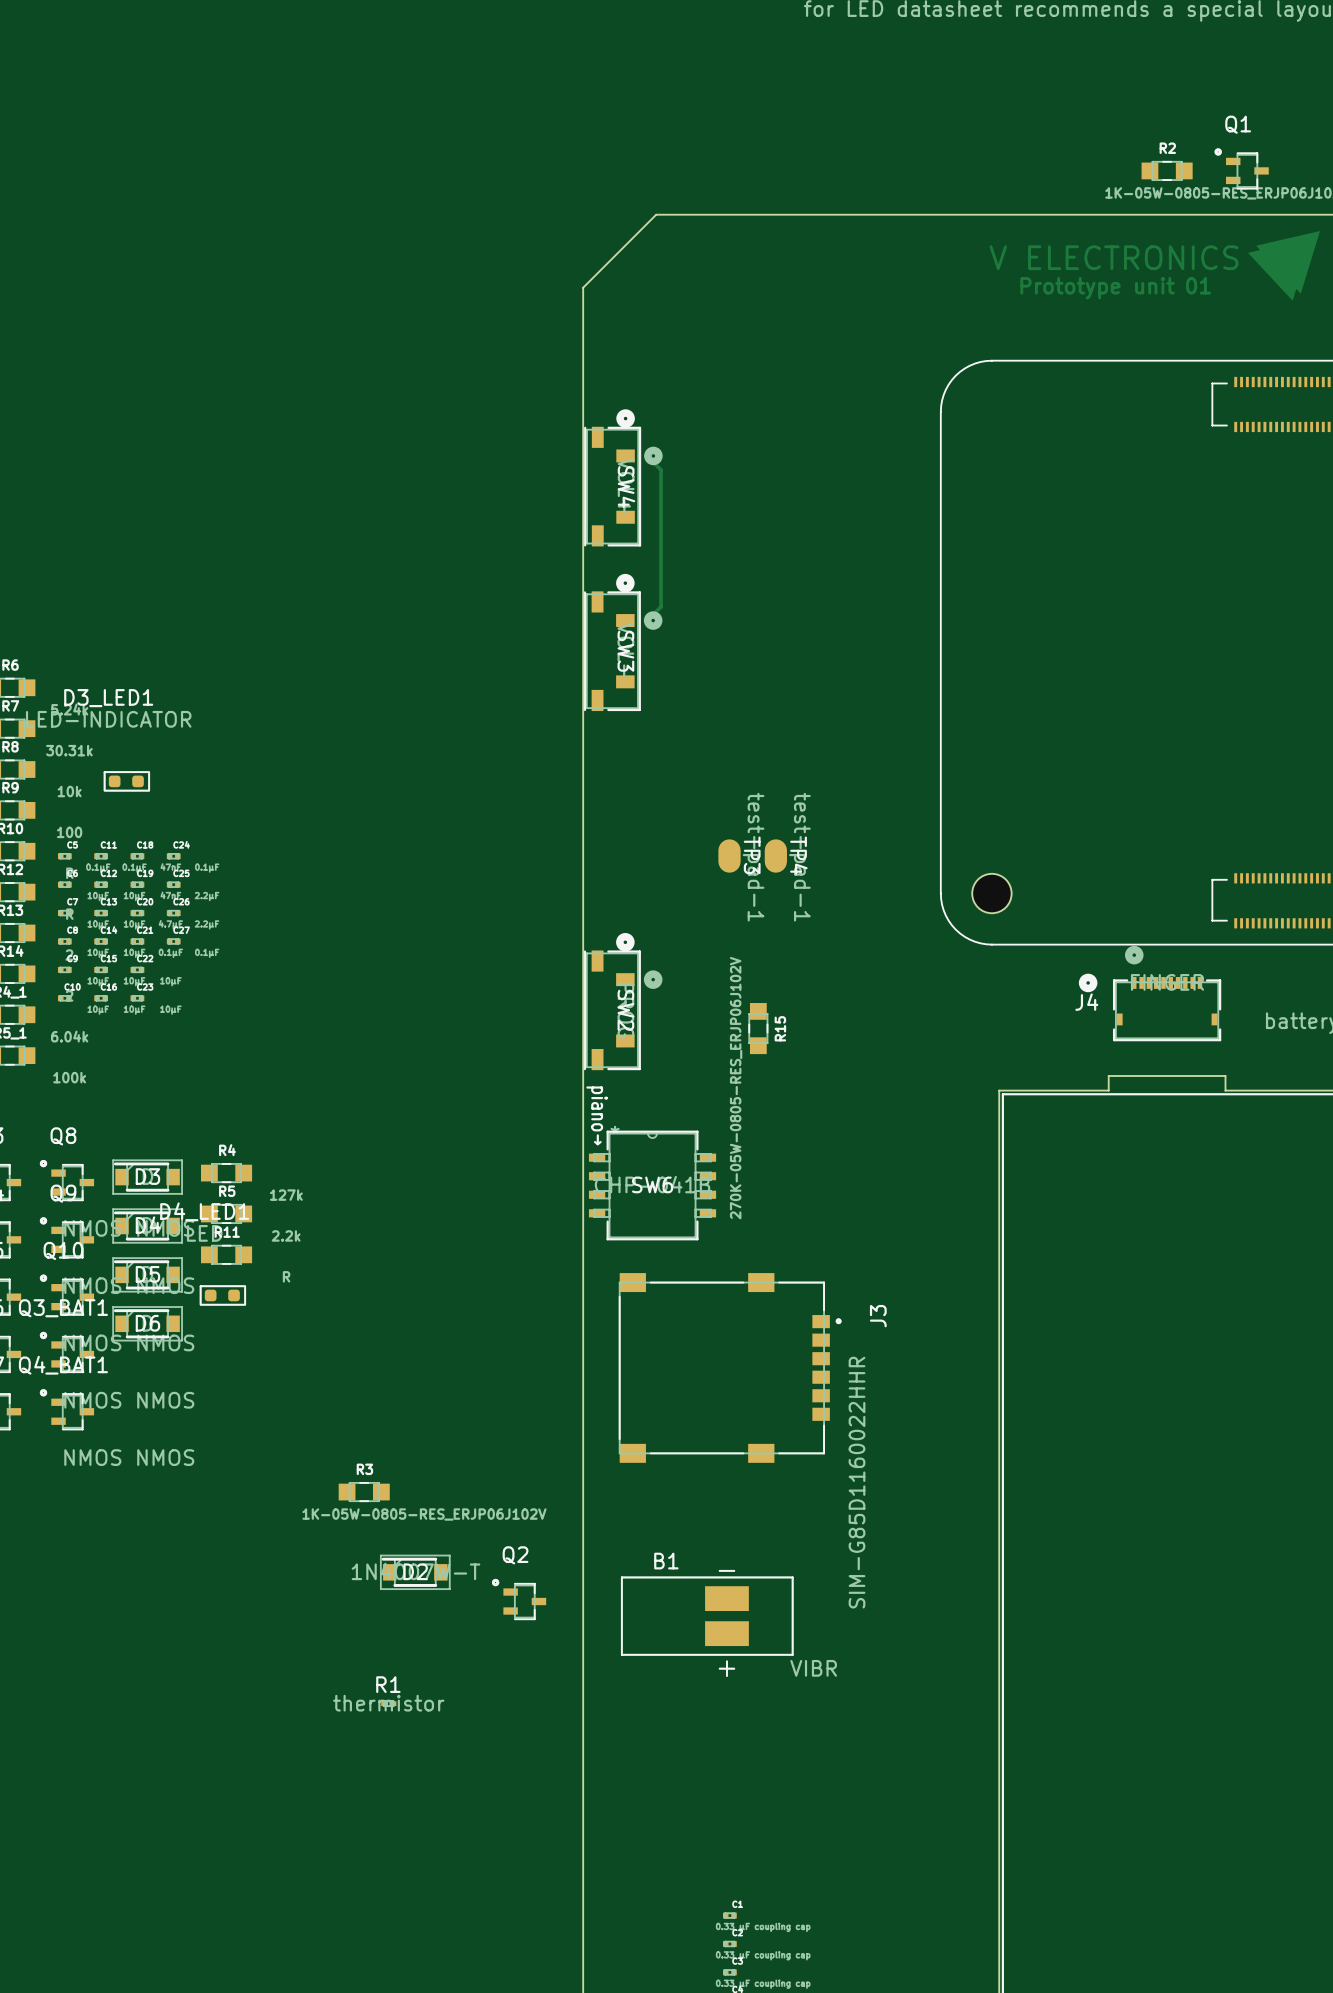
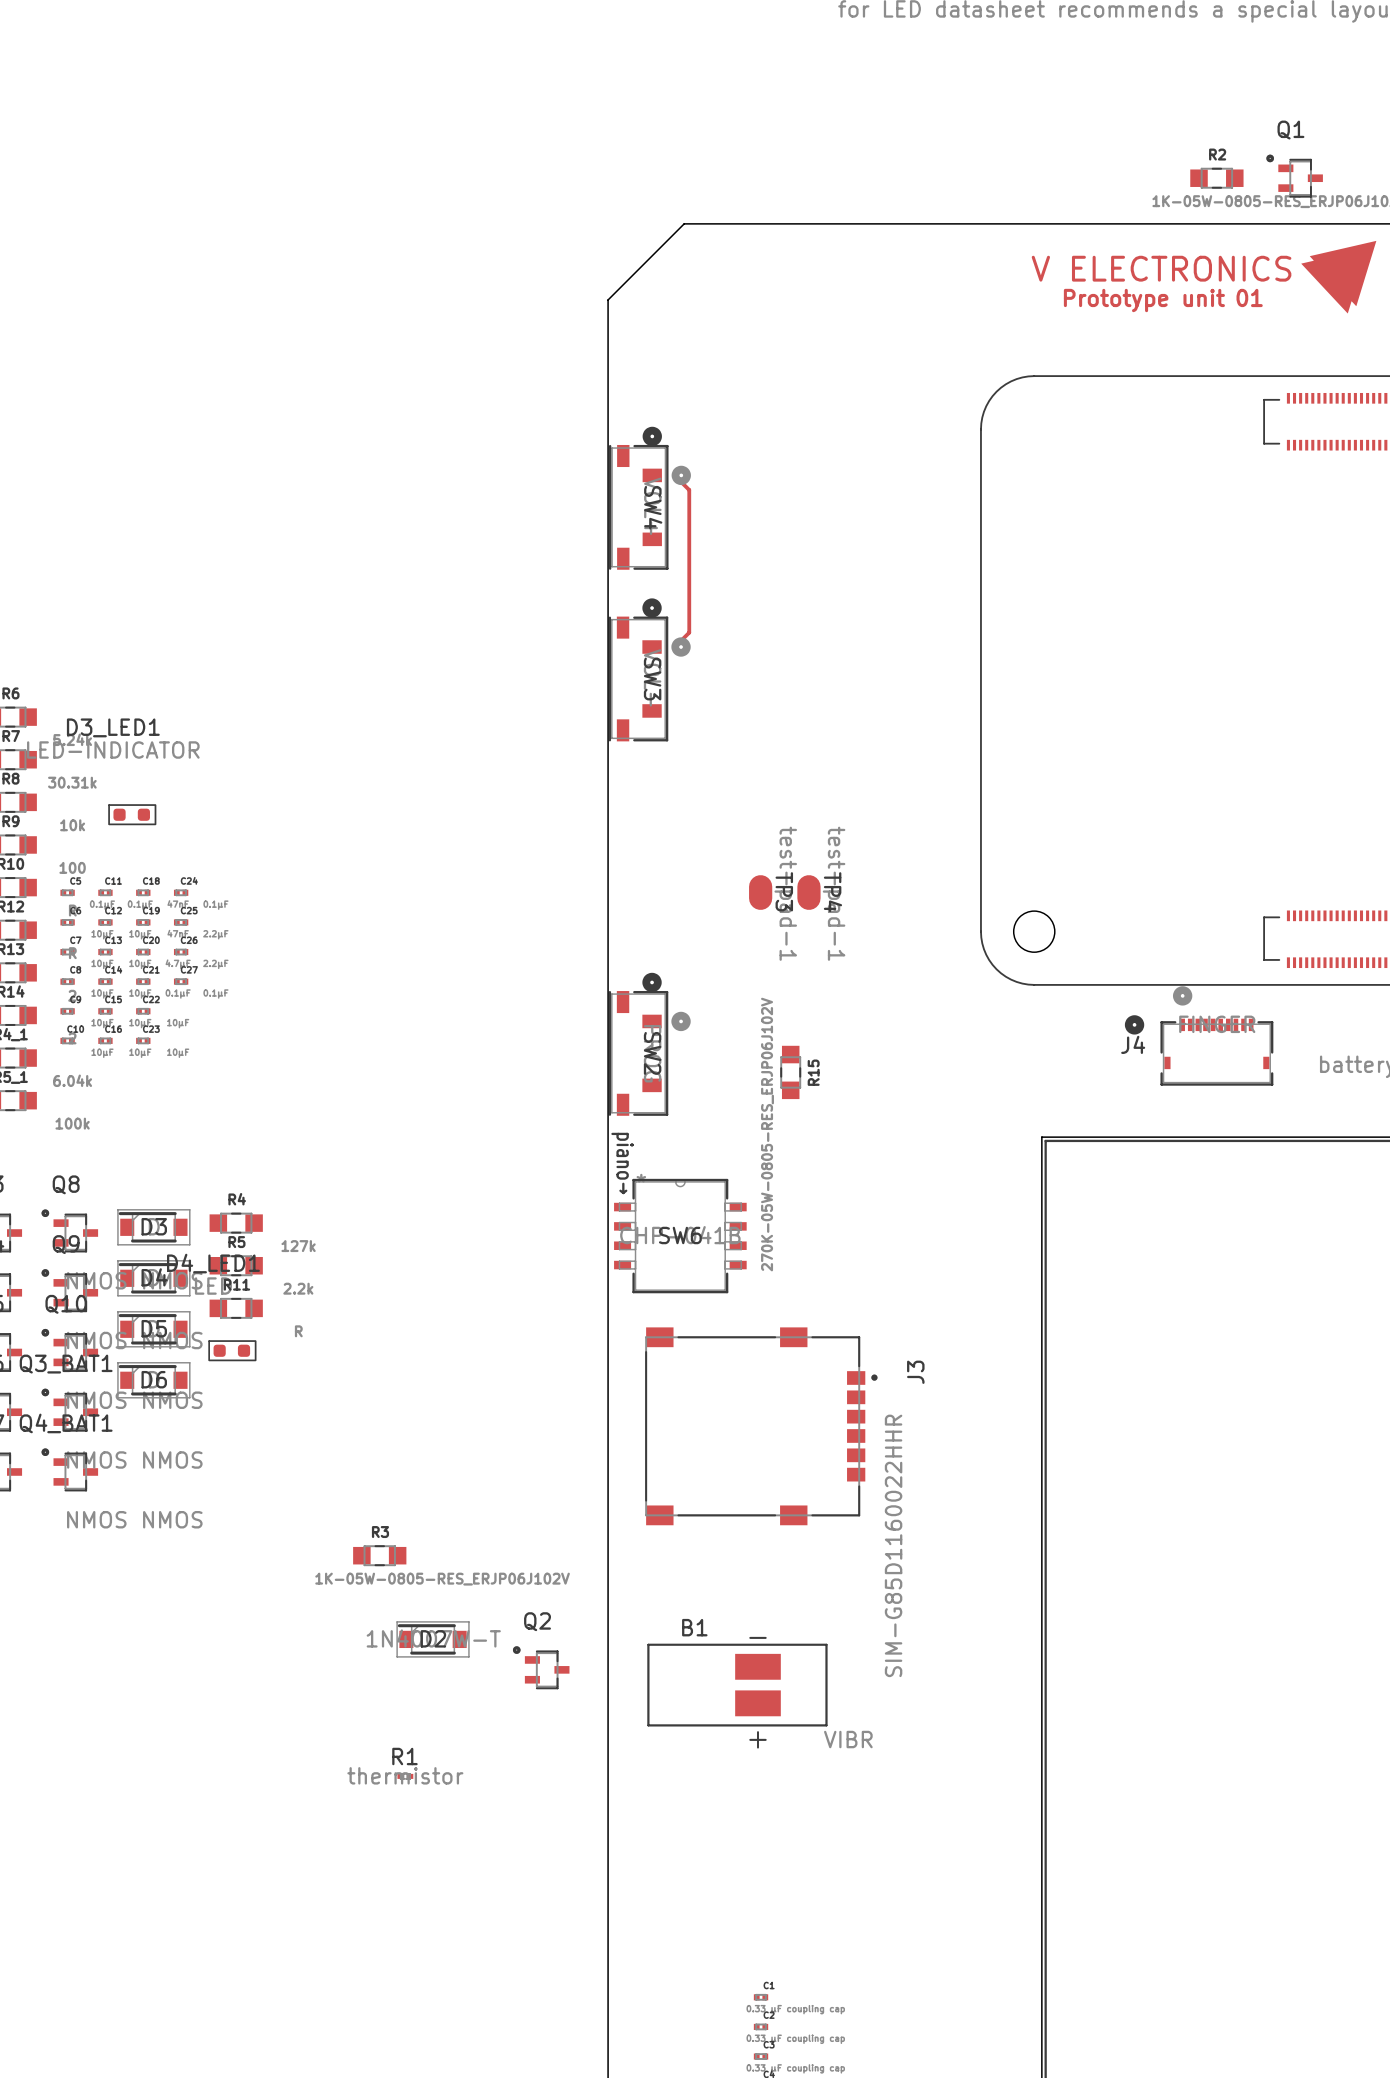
board edge: (1108, 1090) (1108, 1076) (1225, 1076) (1225, 1090) -> (1156, 1137) (1277, 1137)

